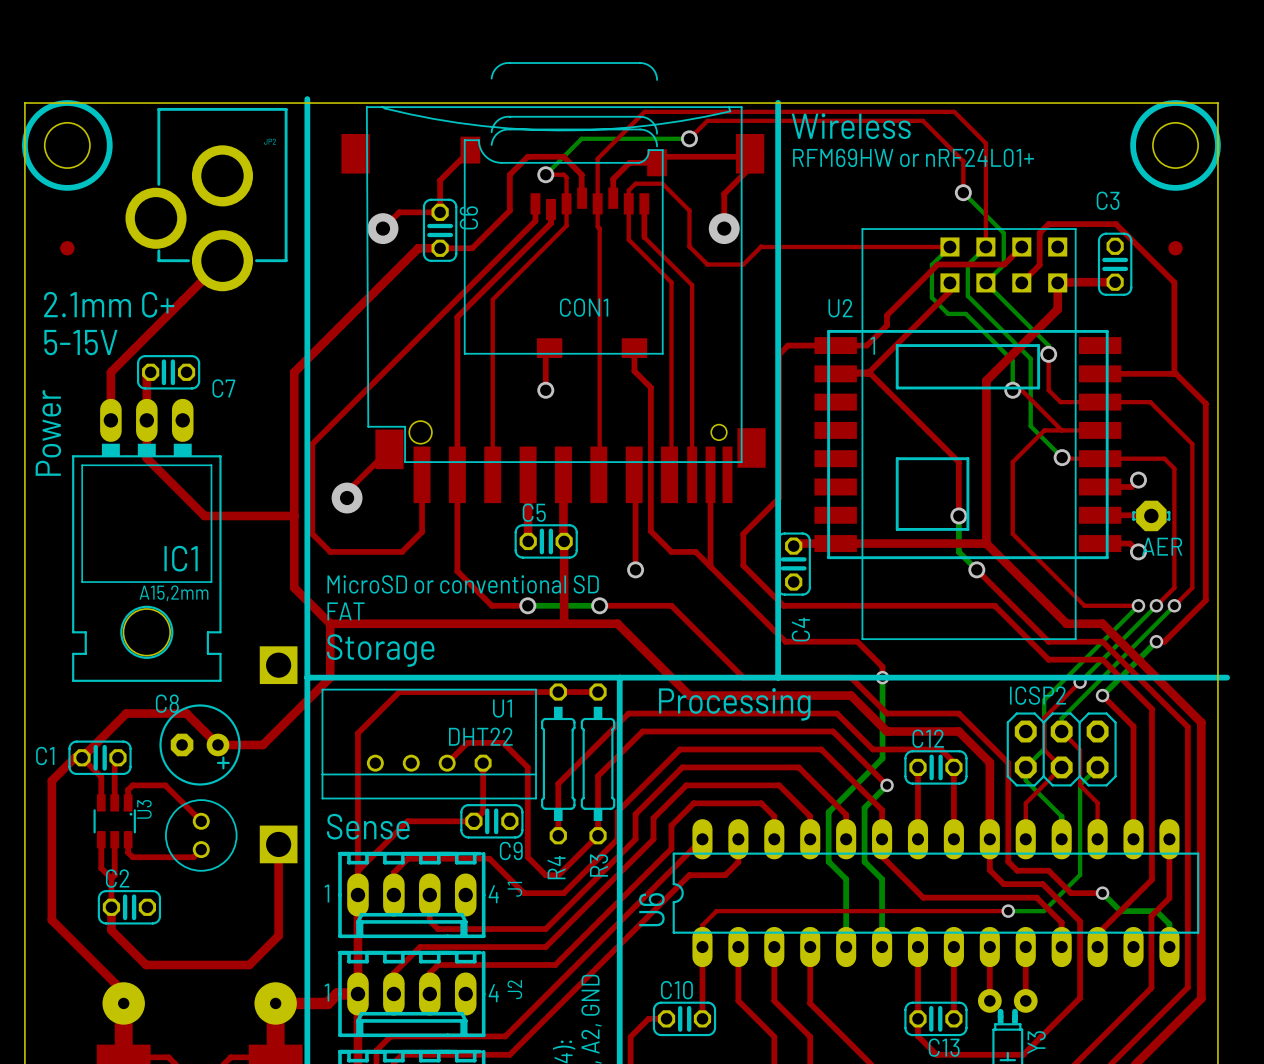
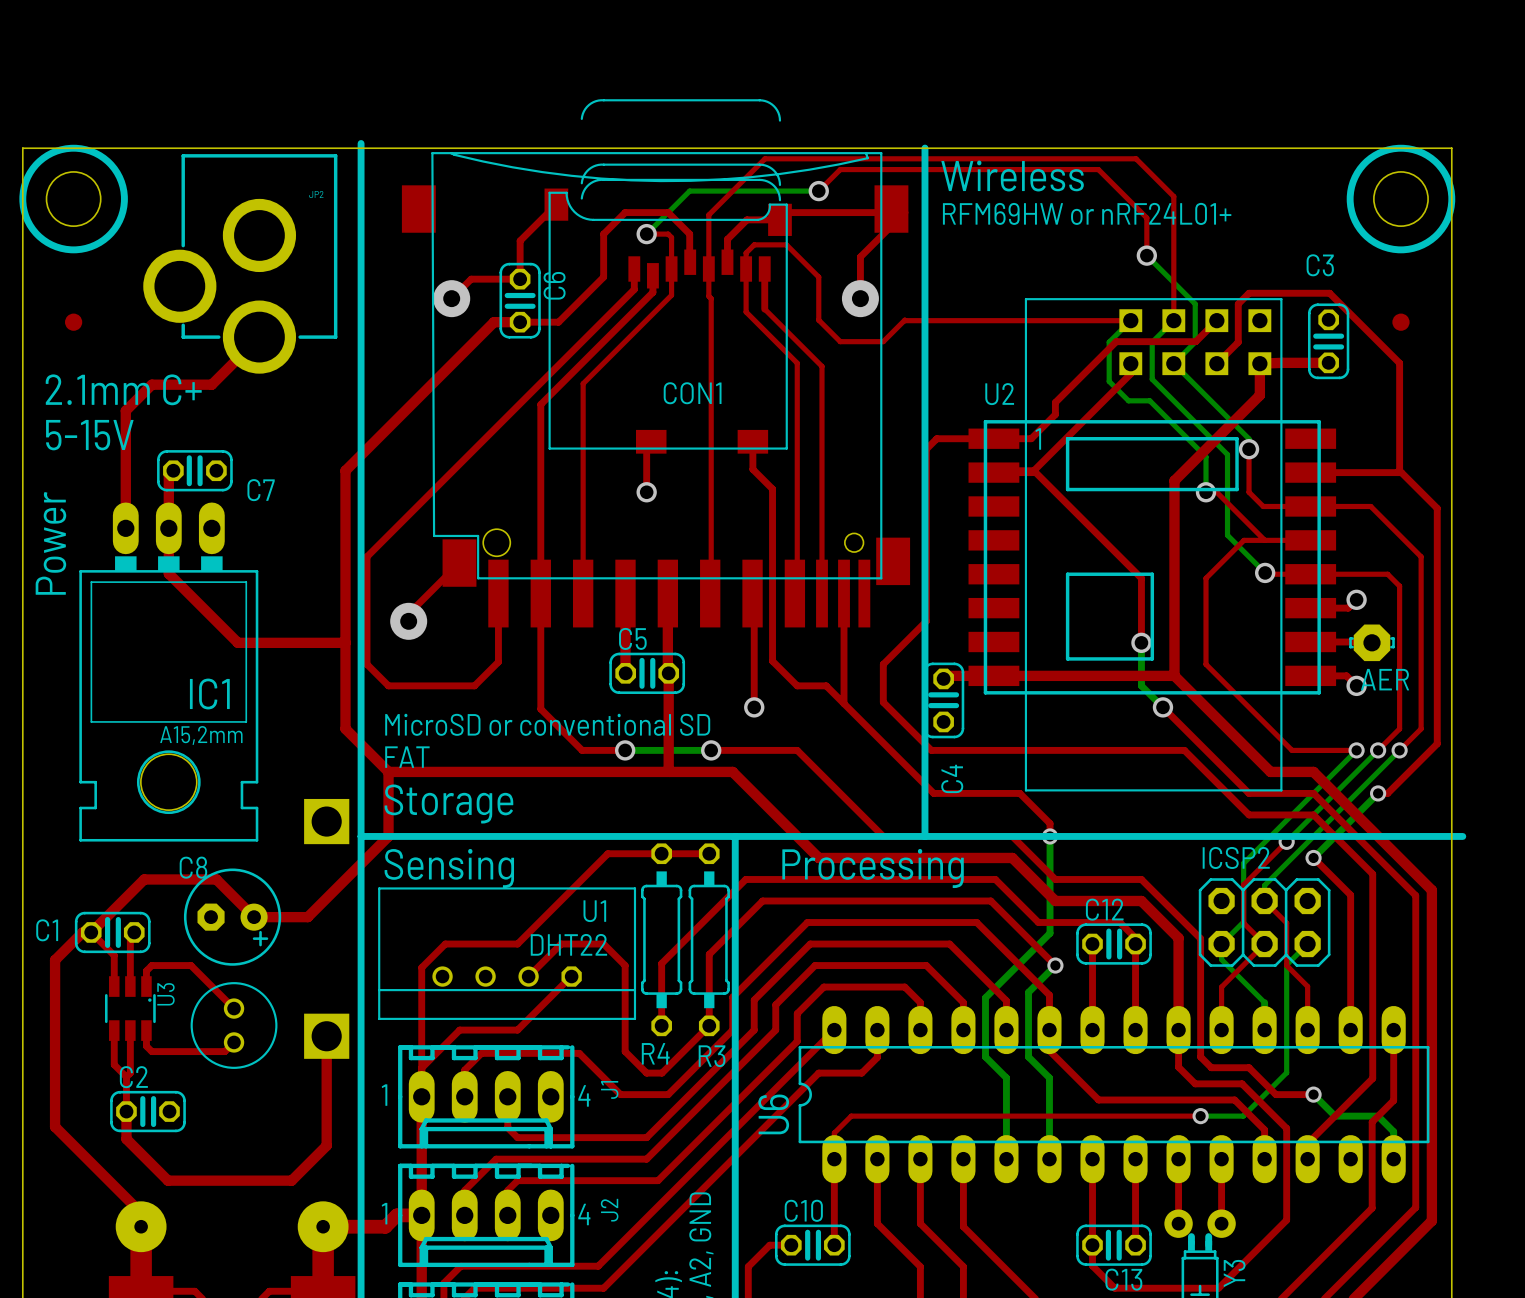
top track: (182, 300) (110, 372) -> (211, 384) (151, 384) (125, 410) (125, 470)
top track: (513, 692) (399, 692) (357, 733) (357, 787) -> (607, 853) (517, 944) (445, 944) (421, 967)
text: none -> Sensing (449, 868)
U1 position: (429, 744) -> (507, 953)
top track: (447, 763) (467, 742) (503, 742) (527, 767) (527, 785) -> (528, 976) (561, 944) (603, 944) (625, 965)
top track: (483, 763) (483, 812) (473, 821) (407, 821) (389, 839) -> (571, 976) (517, 1030) (459, 1030)
C9: (491, 821) -> none
text: Sense (368, 826) -> none
R3 name rotation: 0° (599, 865) -> 90° clockwise (712, 1056)
R4 name rotation: 0° (556, 867) -> 90° clockwise (655, 1053)

